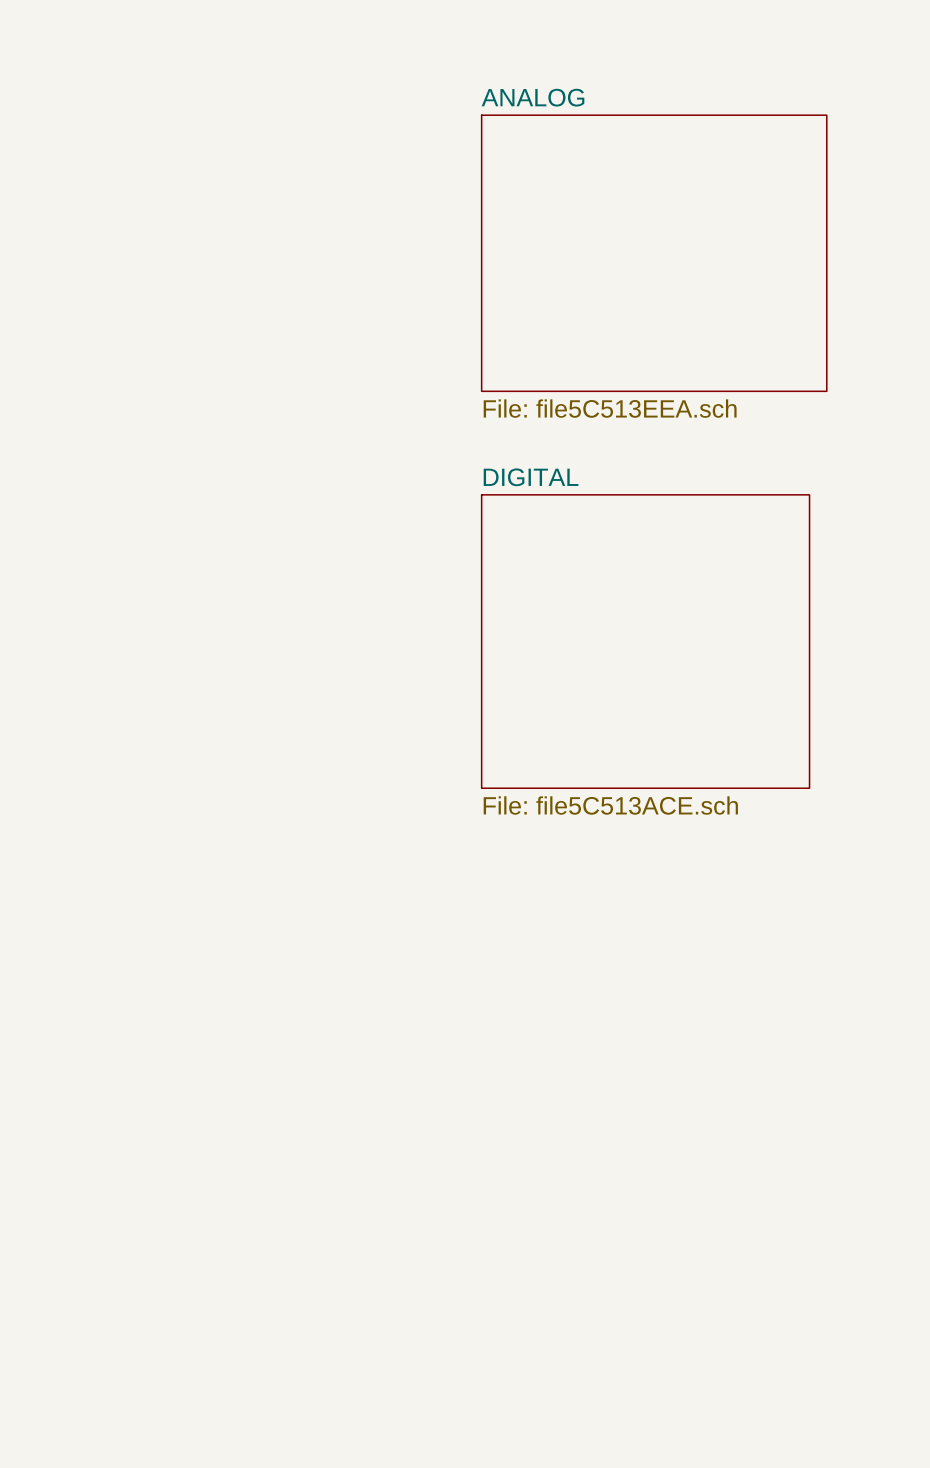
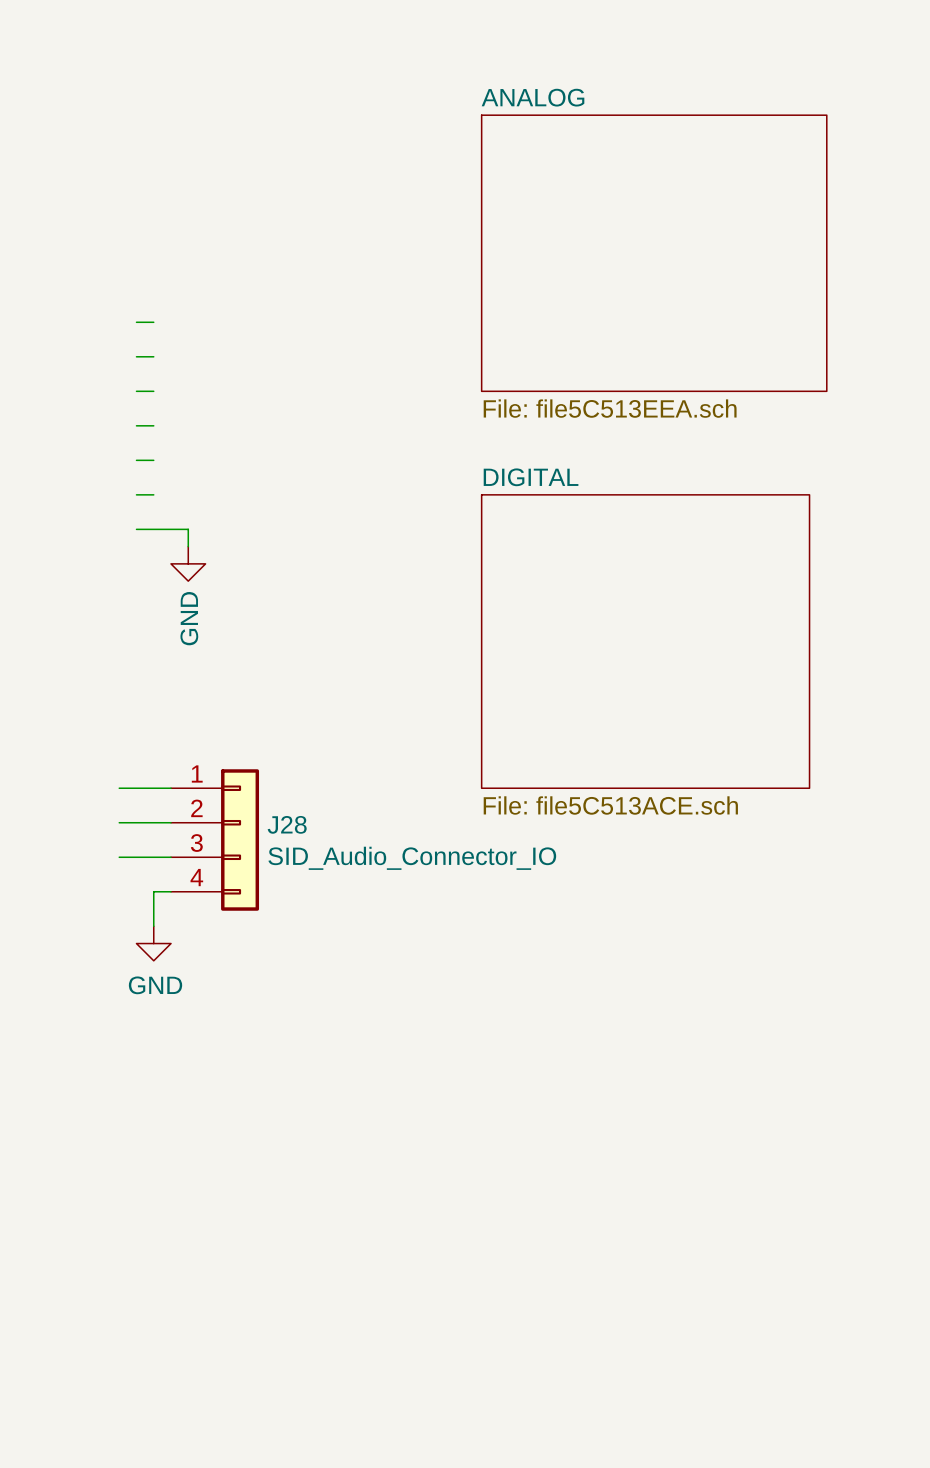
wire: none -> (136, 322) (153, 322)
wire: none -> (136, 356) (153, 356)
wire: none -> (136, 391) (153, 391)
wire: none -> (136, 425) (153, 425)
wire: none -> (136, 460) (153, 460)
wire: none -> (136, 494) (153, 494)
wire: none -> (136, 529) (188, 529) (188, 546)
power symbol: none -> GND (188, 563)
wire: none -> (119, 788) (171, 788)
wire: none -> (119, 822) (171, 822)
J28: none -> SID_Audio_Connector_IO (215, 840)
wire: none -> (119, 857) (171, 857)
wire: none -> (171, 891) (153, 891) (153, 926)
power symbol: none -> GND (153, 943)

